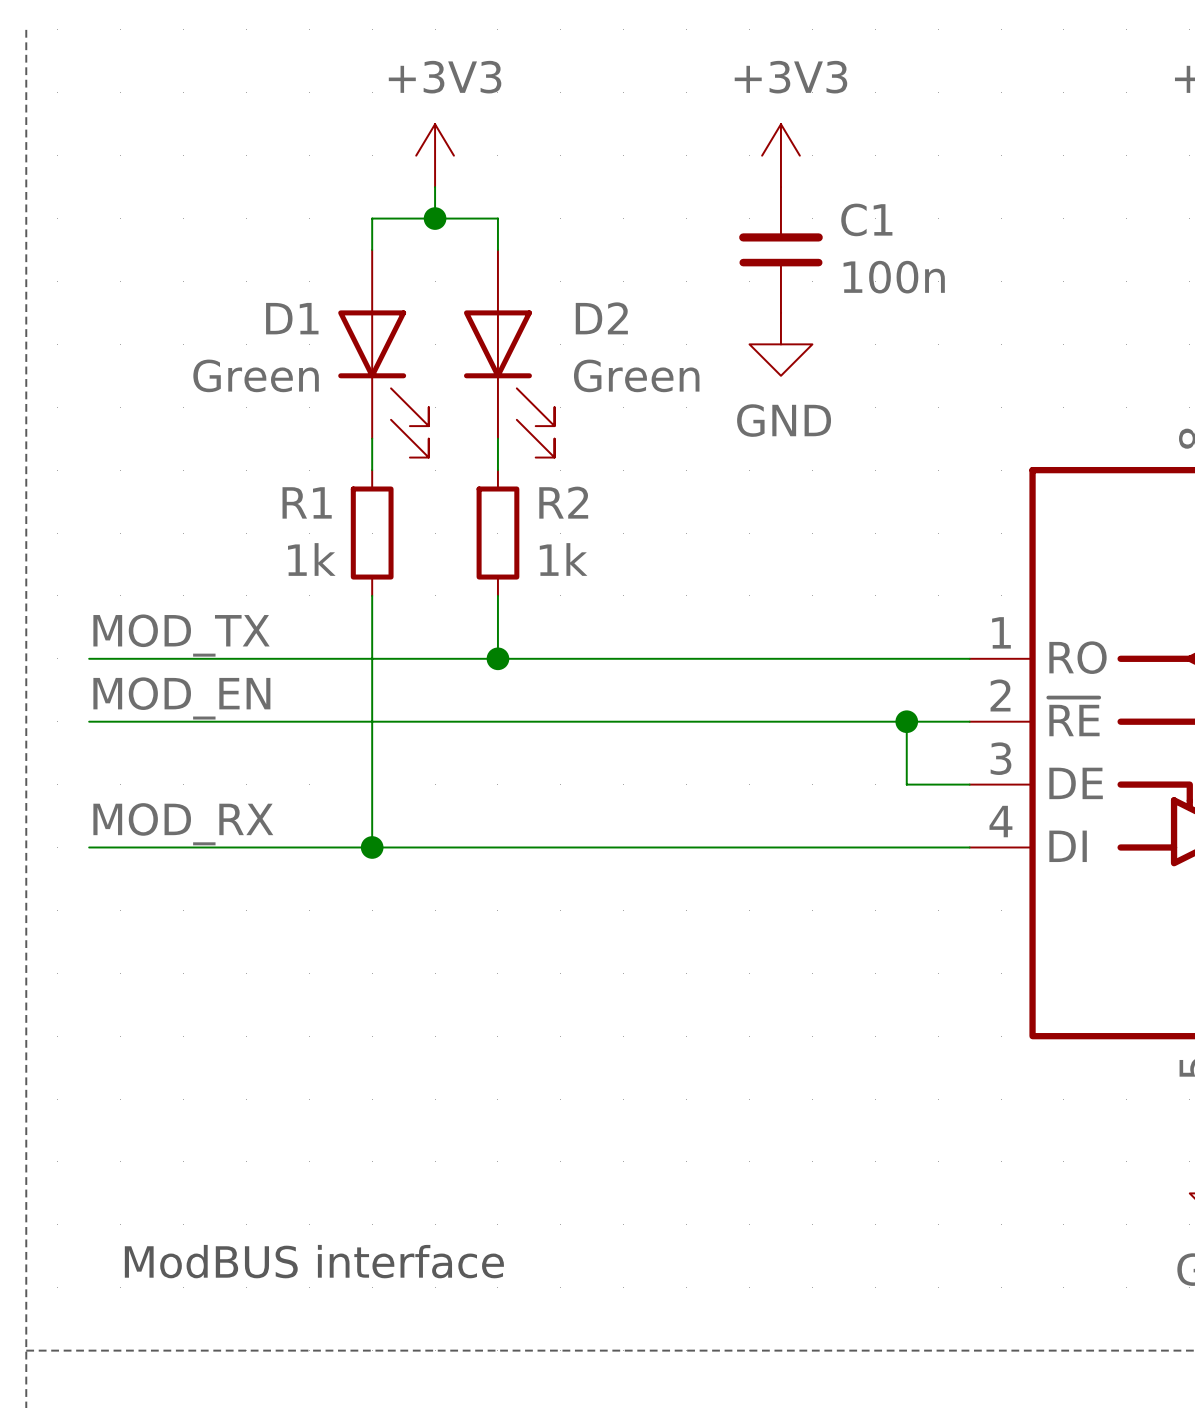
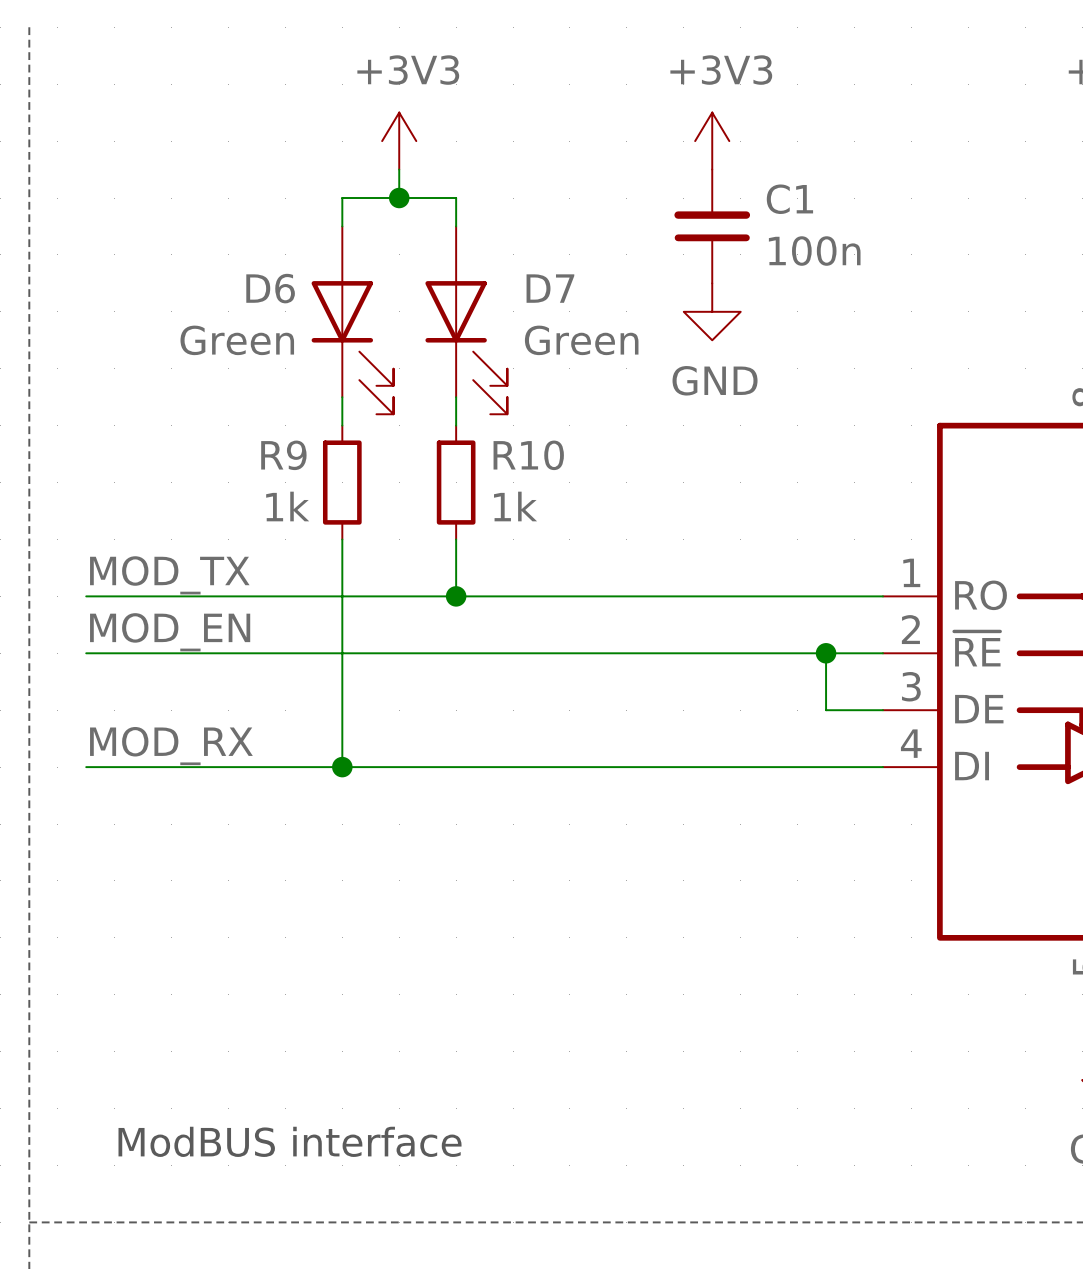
D1 name: D1 (292, 318) -> D6 (270, 288)
D2 name: D2 (601, 318) -> D7 (550, 288)
R1 name: R1 (307, 502) -> R9 (283, 455)
R2 name: R2 (563, 502) -> R10 (528, 455)

